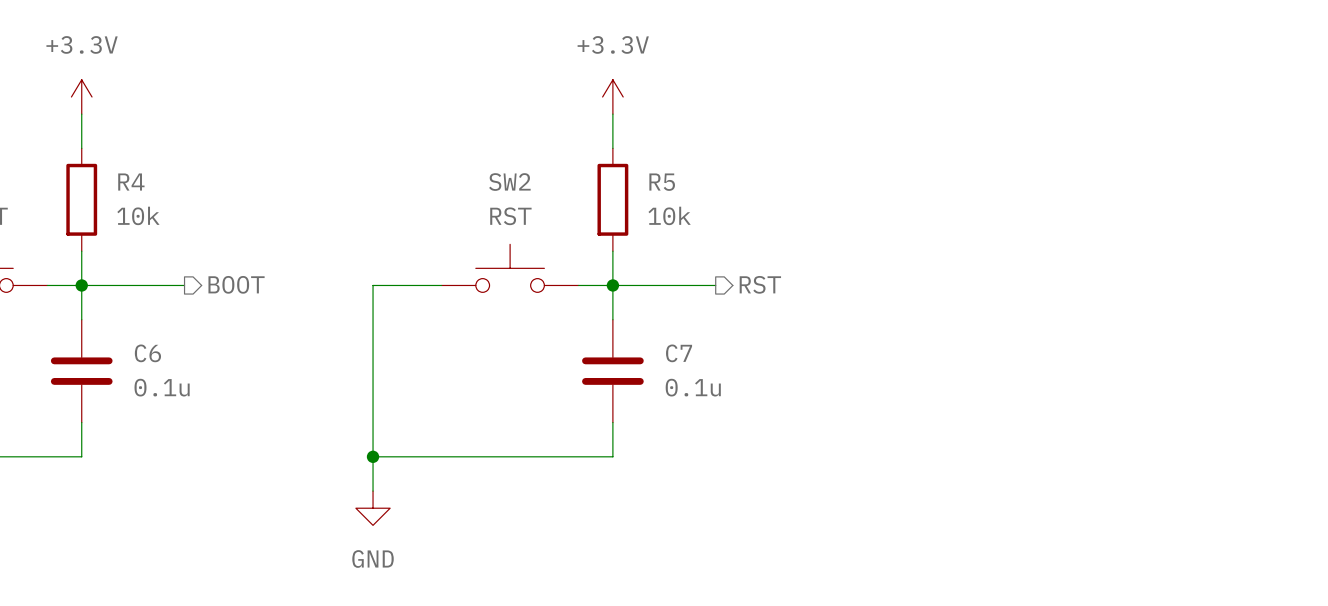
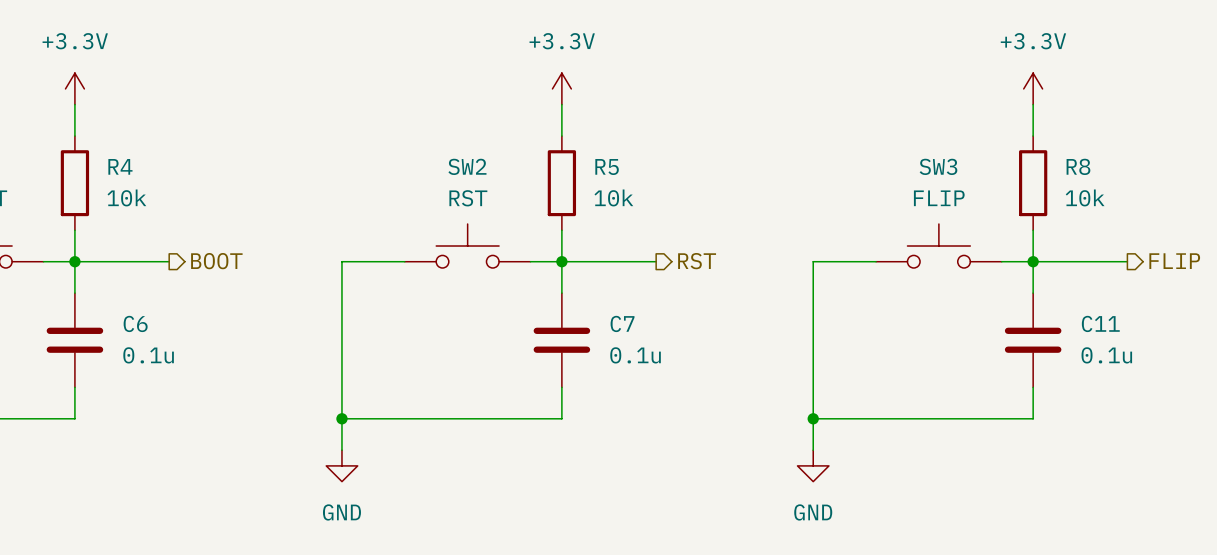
power symbol: none -> +3.3V (1033, 88)
wire: none -> (1033, 104) (1033, 136)
R8: none -> 10k (1033, 183)
wire: none -> (1033, 230) (1033, 293)
SW3: none -> FLIP (938, 246)
hierarchical label: none -> FLIP (1174, 261)
wire: none -> (876, 261) (813, 261) (813, 450)
wire: none -> (1001, 261) (1127, 261)
junction: none -> (1033, 261)
C11: none -> 0.1u (1033, 340)
wire: none -> (1033, 387) (1033, 418) (813, 418)
junction: none -> (813, 418)
power symbol: none -> GND (813, 465)

